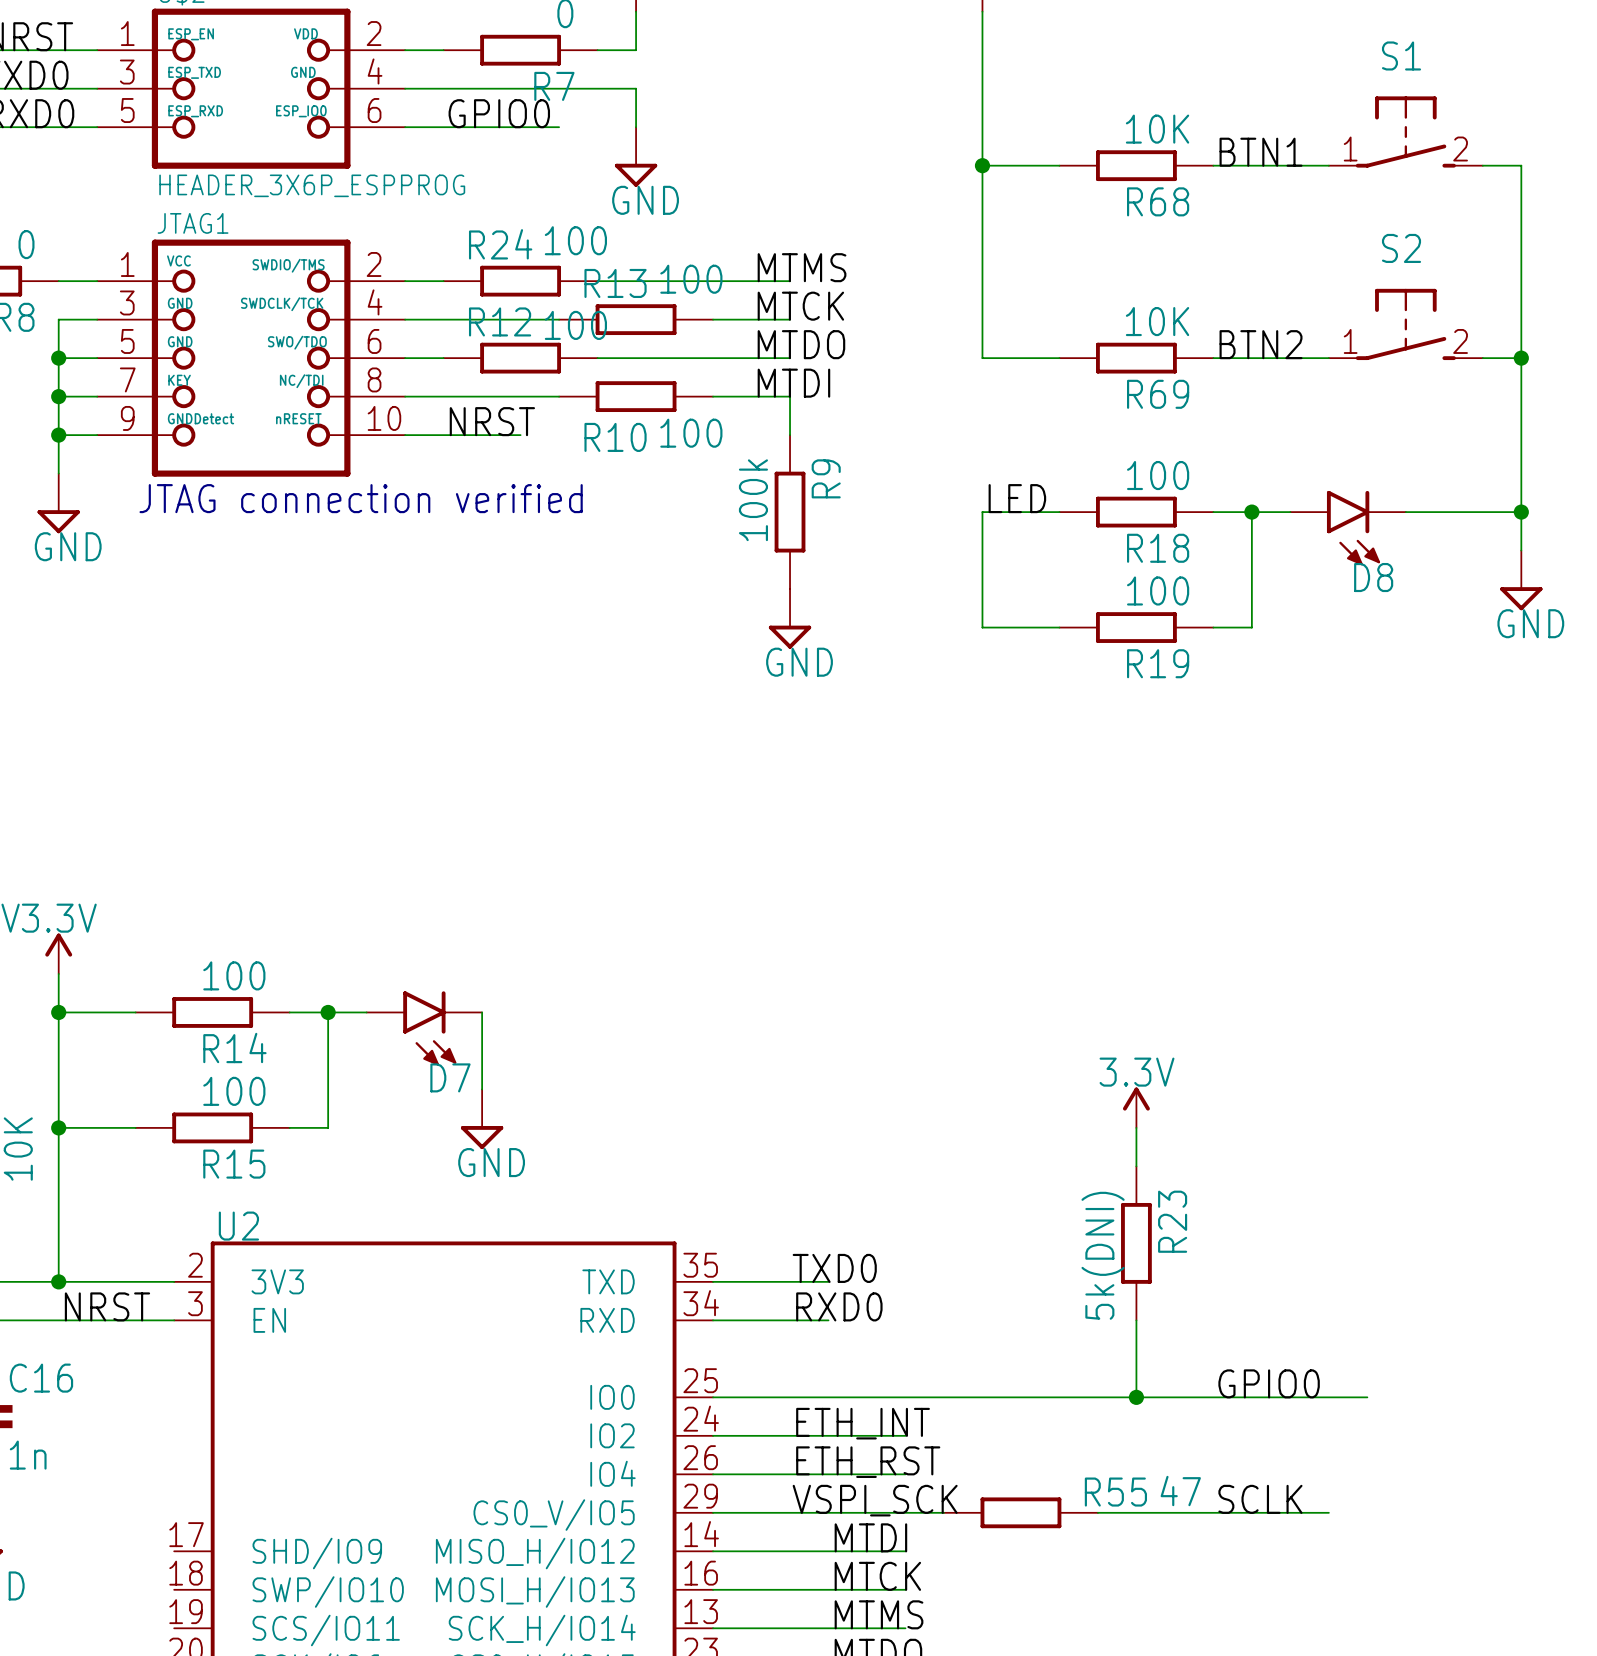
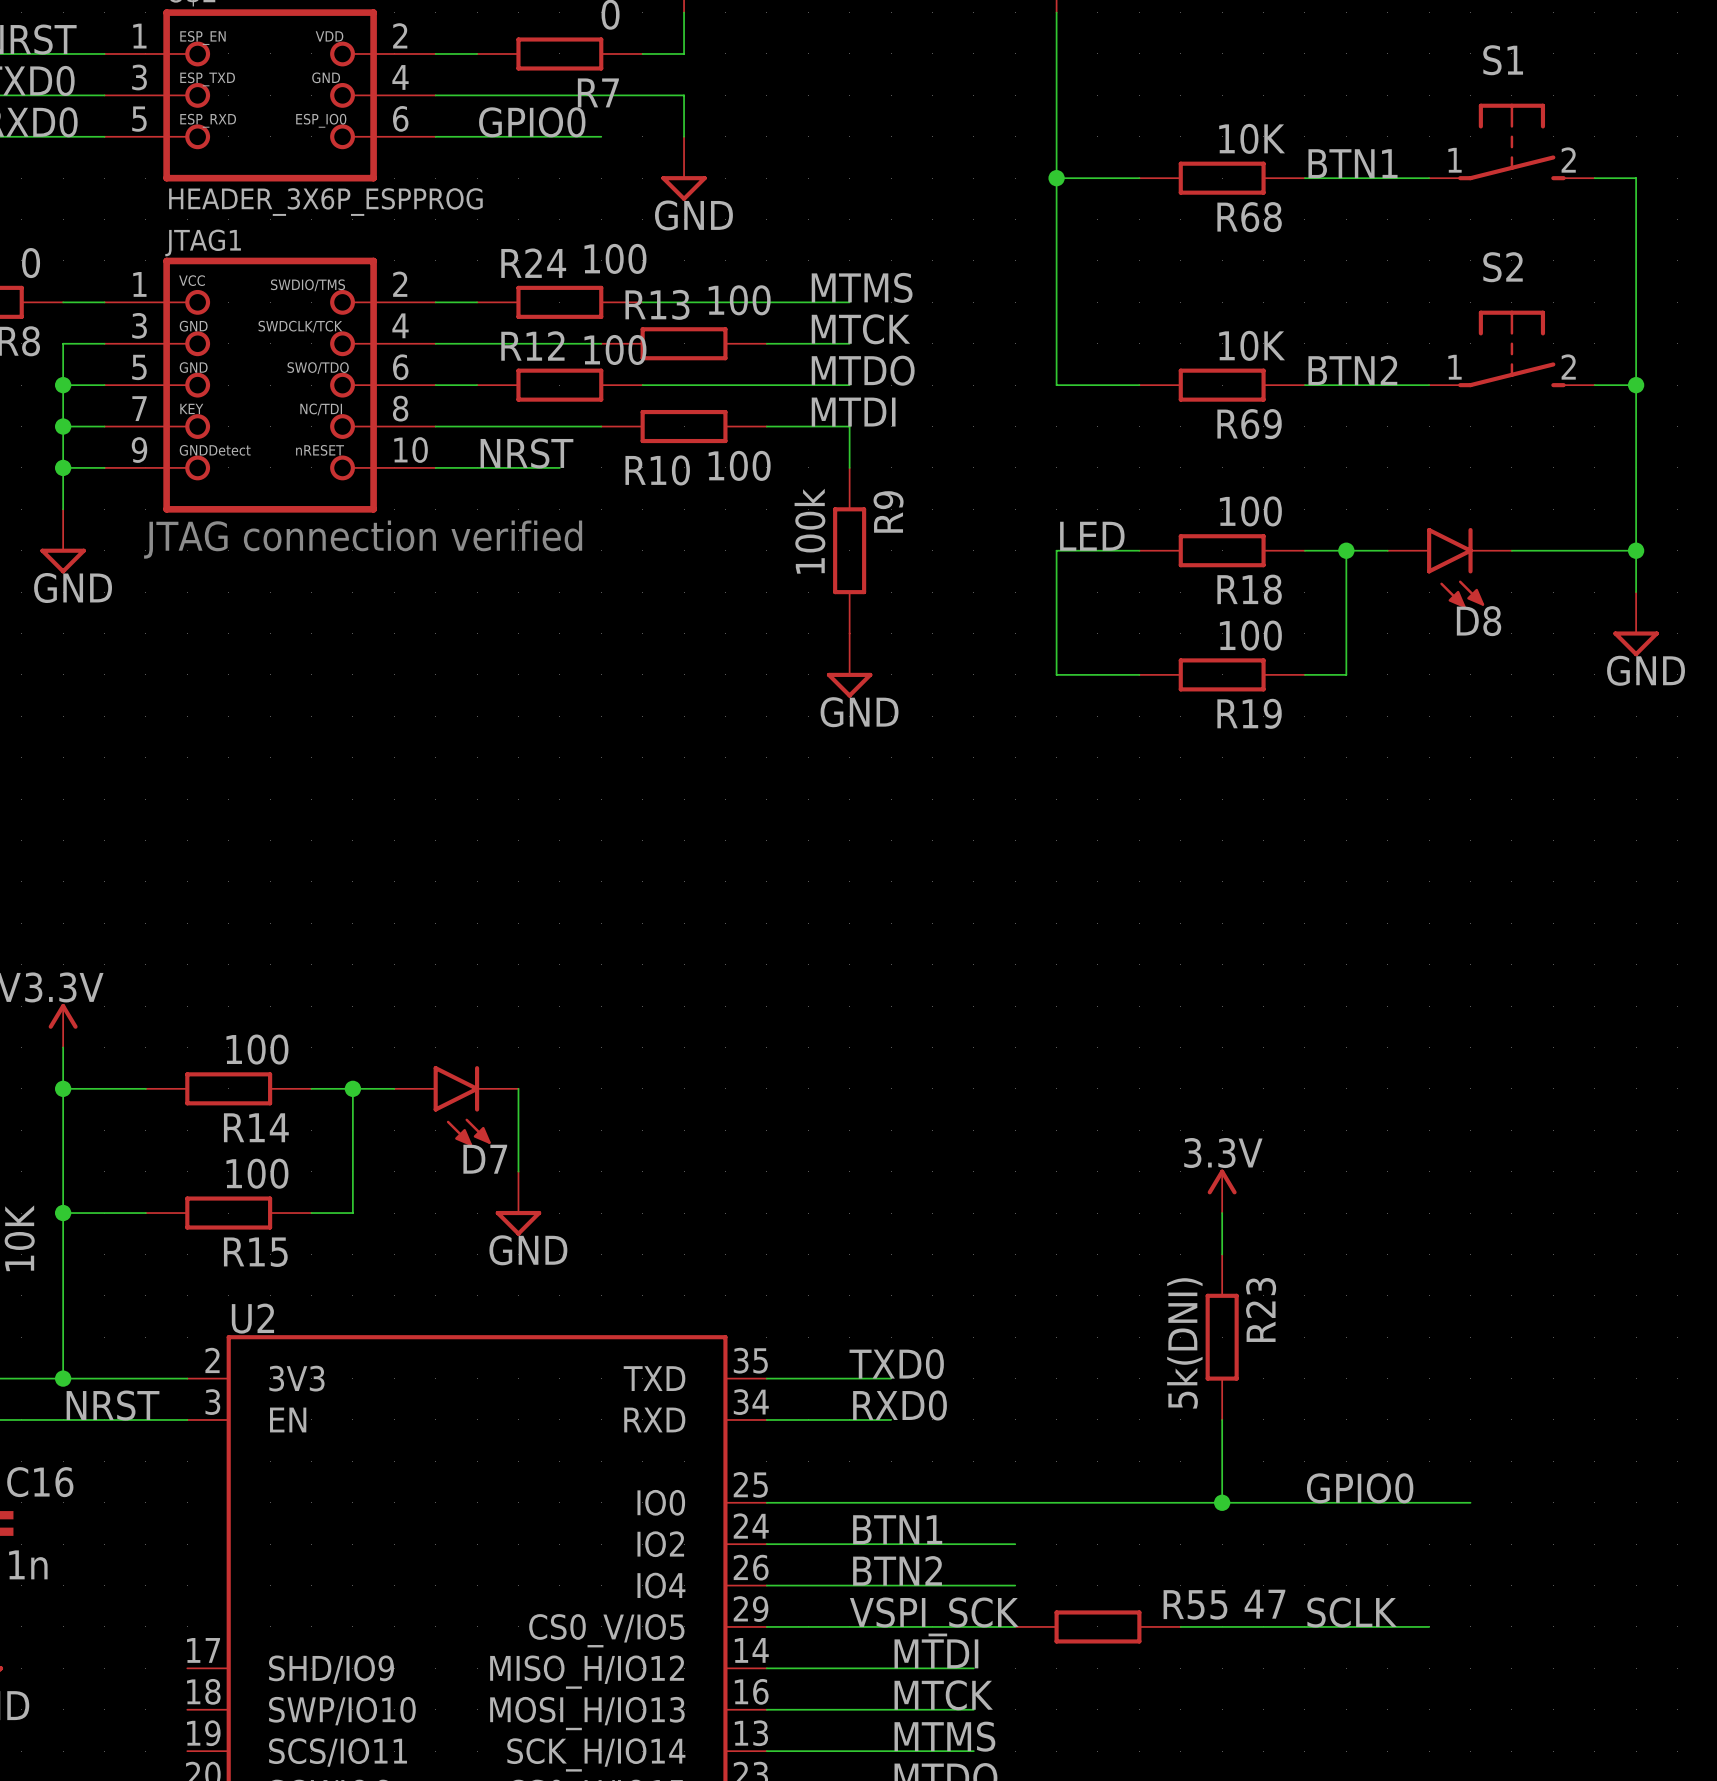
label: ETH_INT (863, 1423) -> BTN1 (897, 1529)
wire: none -> (973, 1544) (1015, 1544)
label: ETH_RST (868, 1462) -> BTN2 (897, 1570)
wire: none -> (973, 1585) (1015, 1585)

